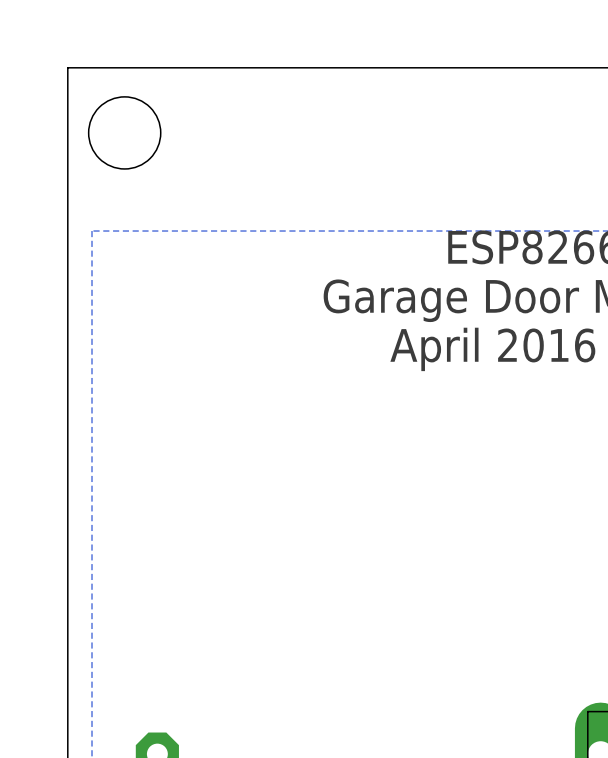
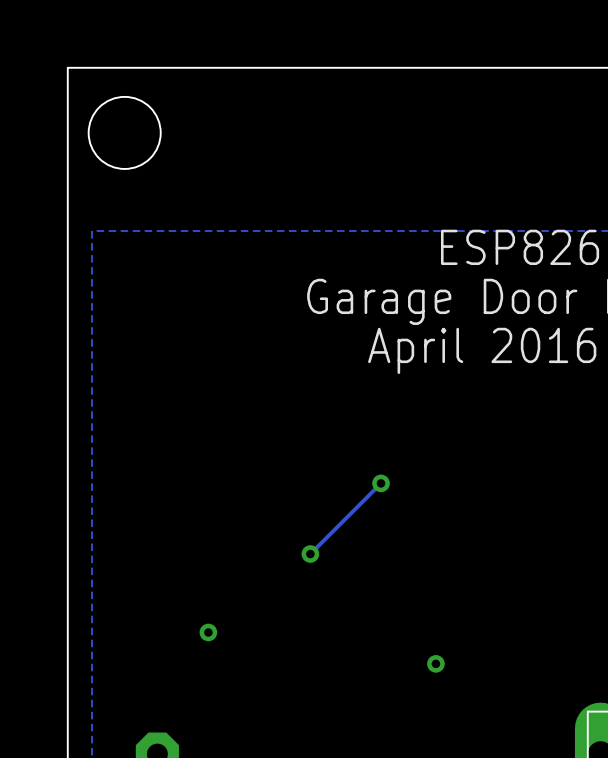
track: none -> (381, 483) (310, 554)
via: none -> (381, 483)
via: none -> (310, 554)
via: none -> (208, 632)
via: none -> (435, 663)

